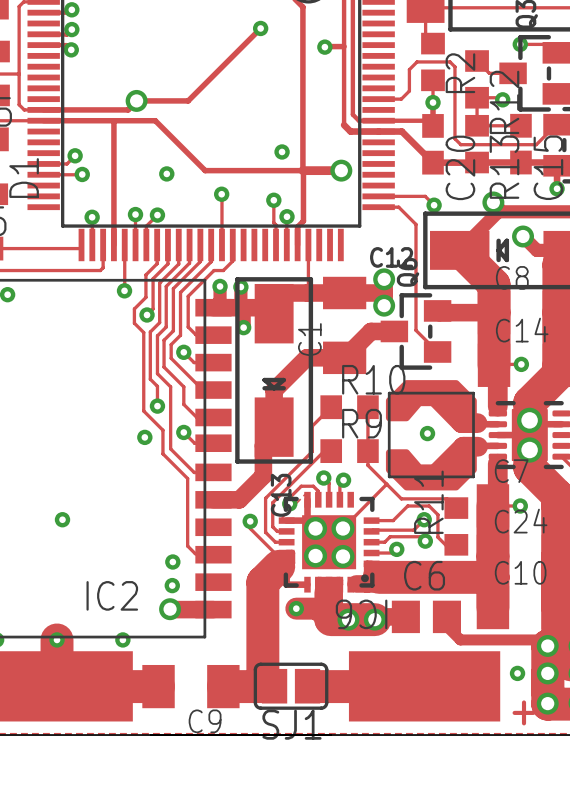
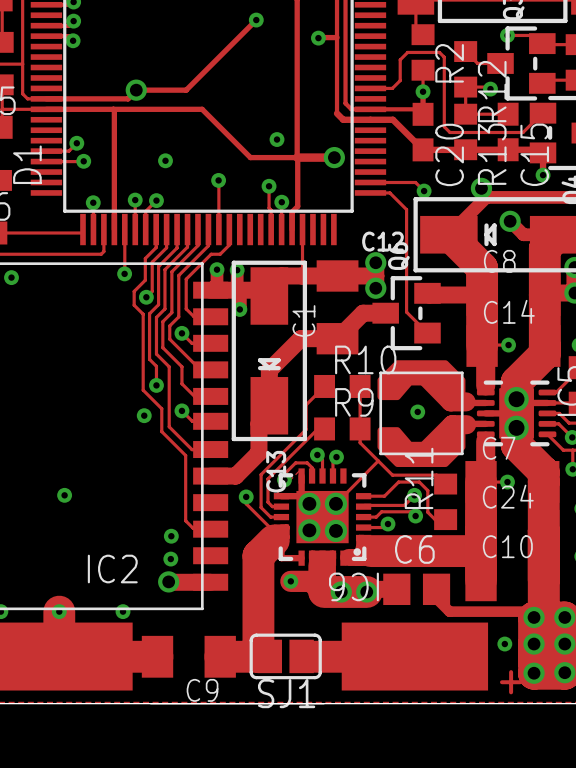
track: (155, 120) (205, 170) (254, 170) -> (154, 109) (202, 109) (250, 157)

